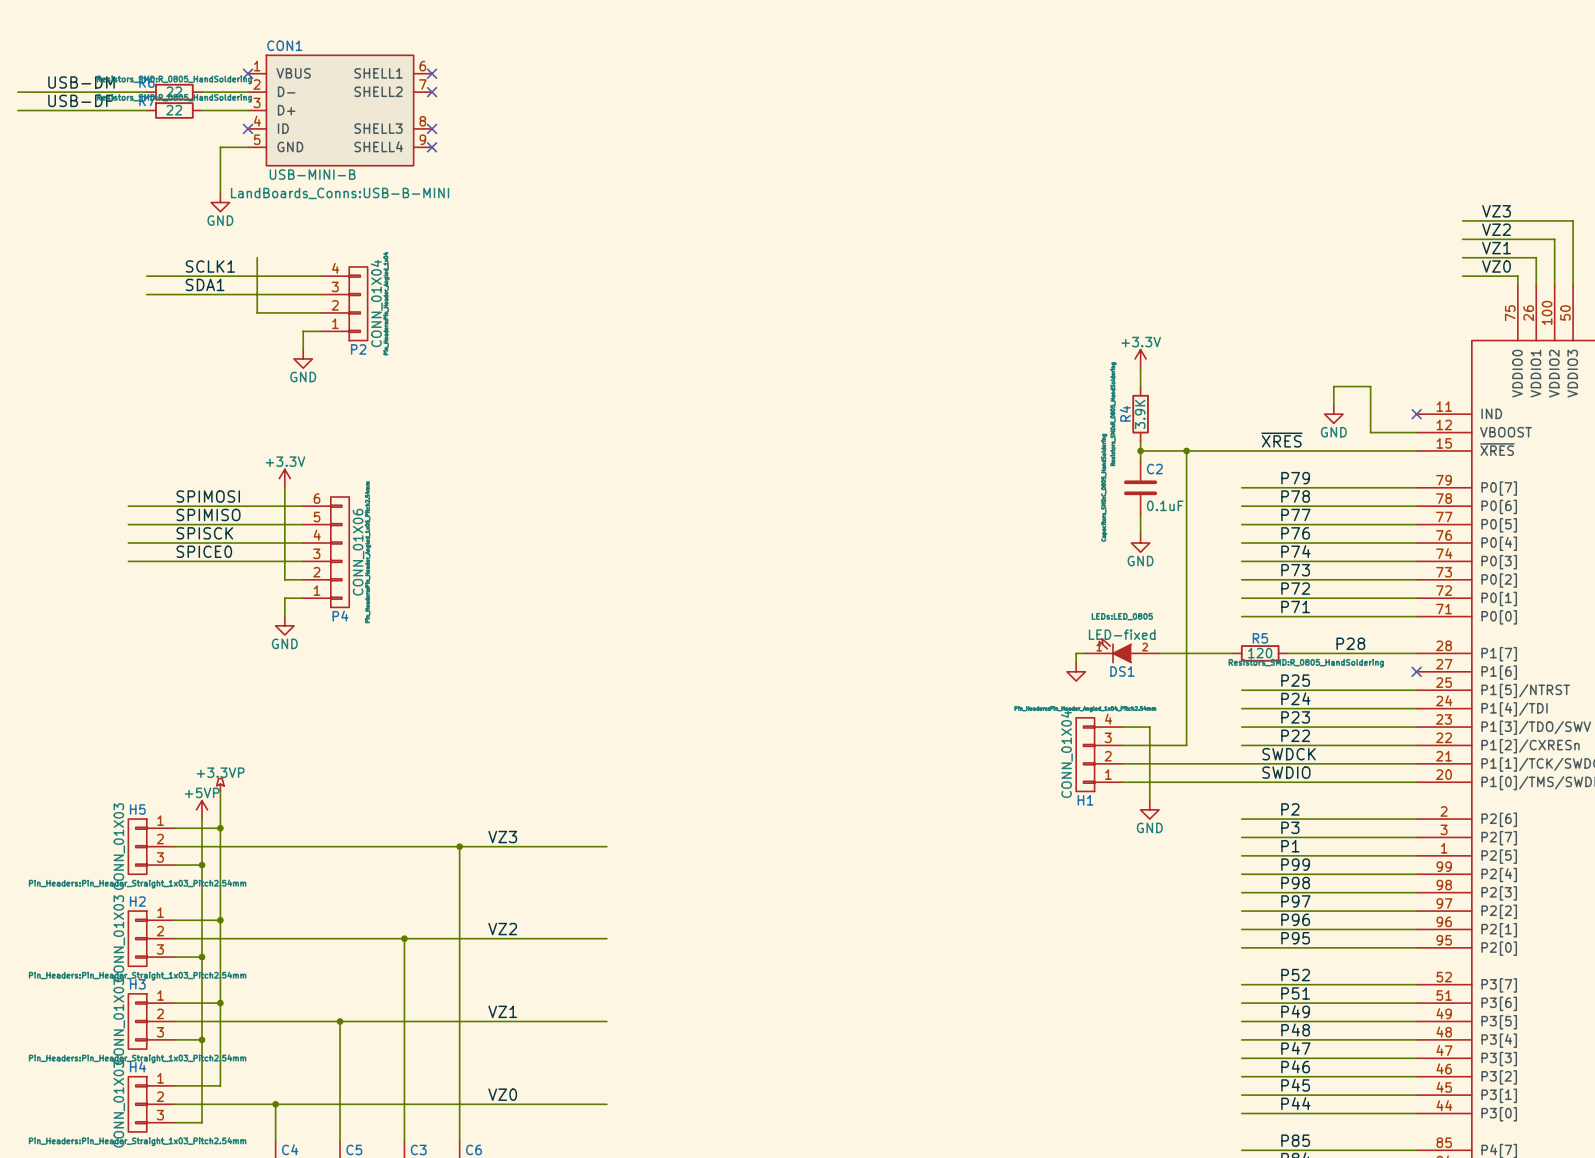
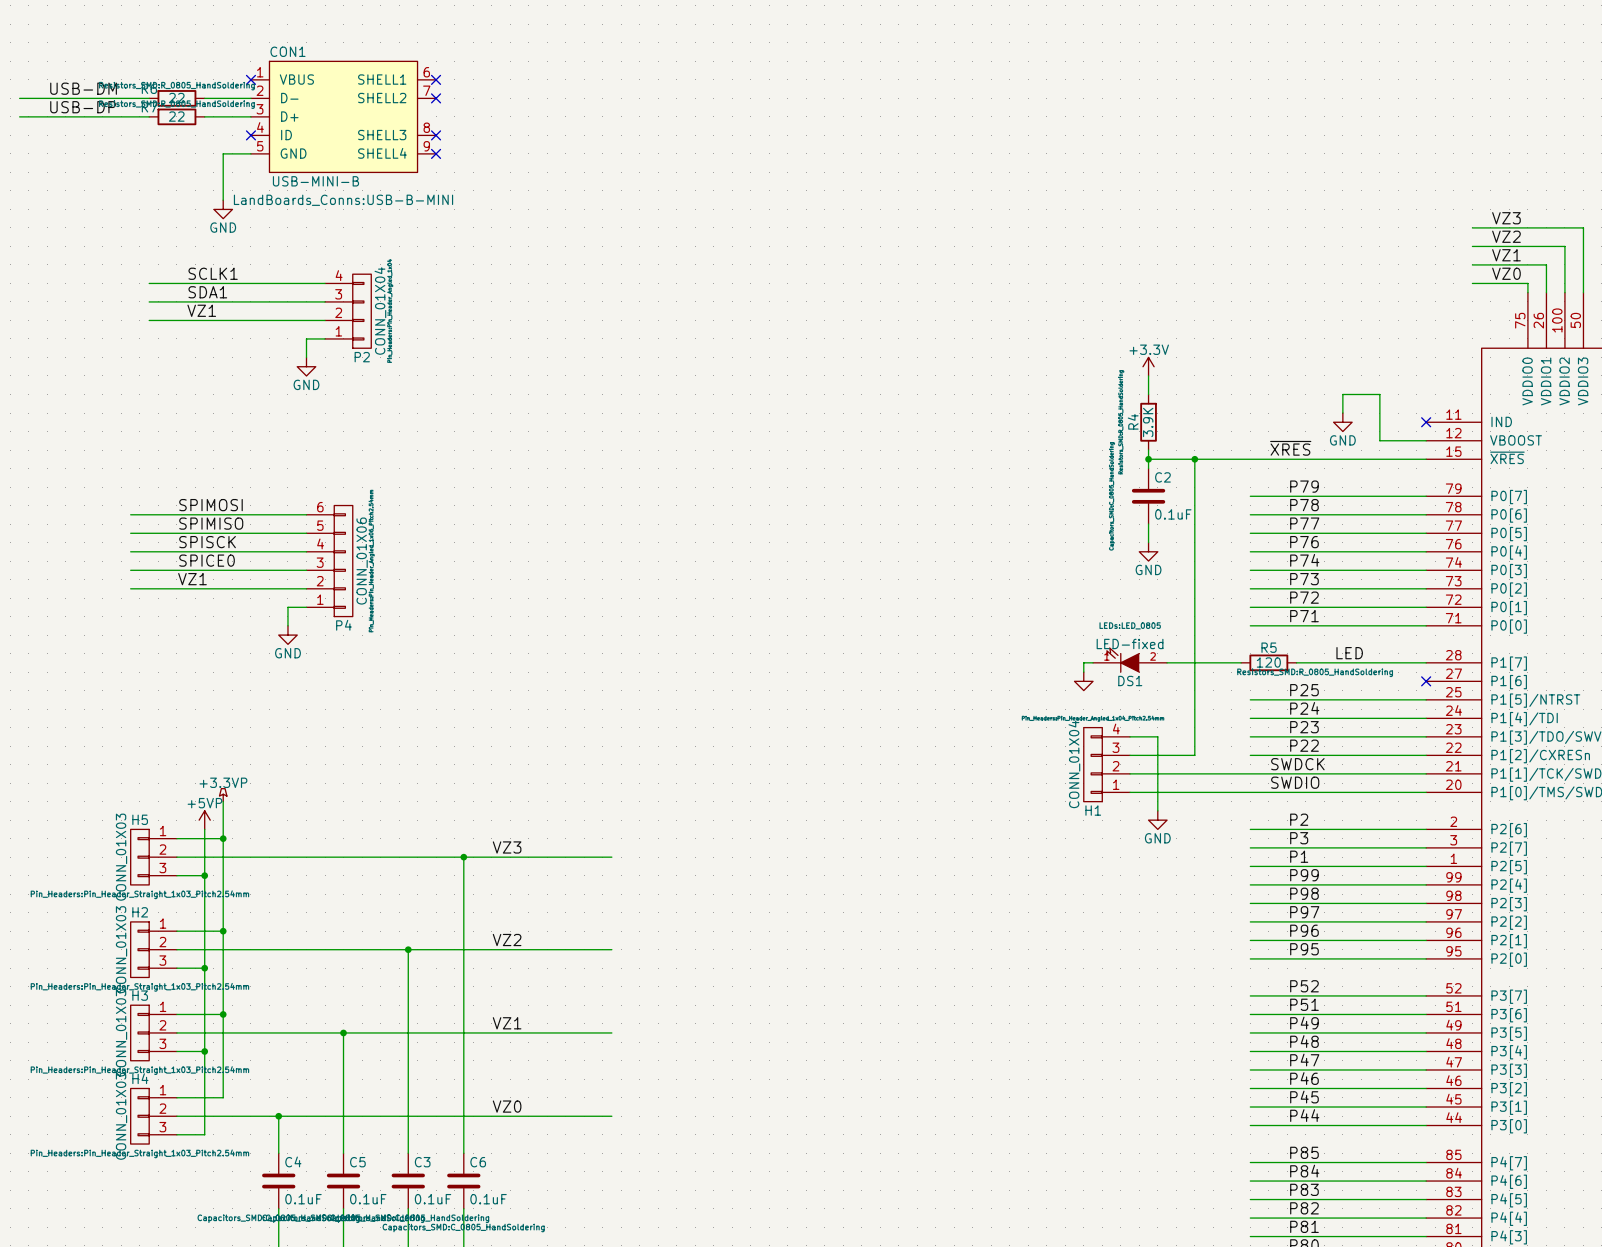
wire: (257, 257) (257, 312) -> (149, 320) (260, 320)
label: none -> VZ1 (201, 310)
power symbol: +3.3V (284, 478) -> none
wire: (284, 487) (284, 579) -> (130, 588) (287, 588)
label: none -> VZ1 (192, 579)
label: none -> LED (1349, 653)
label: P28 (1350, 643) -> none

